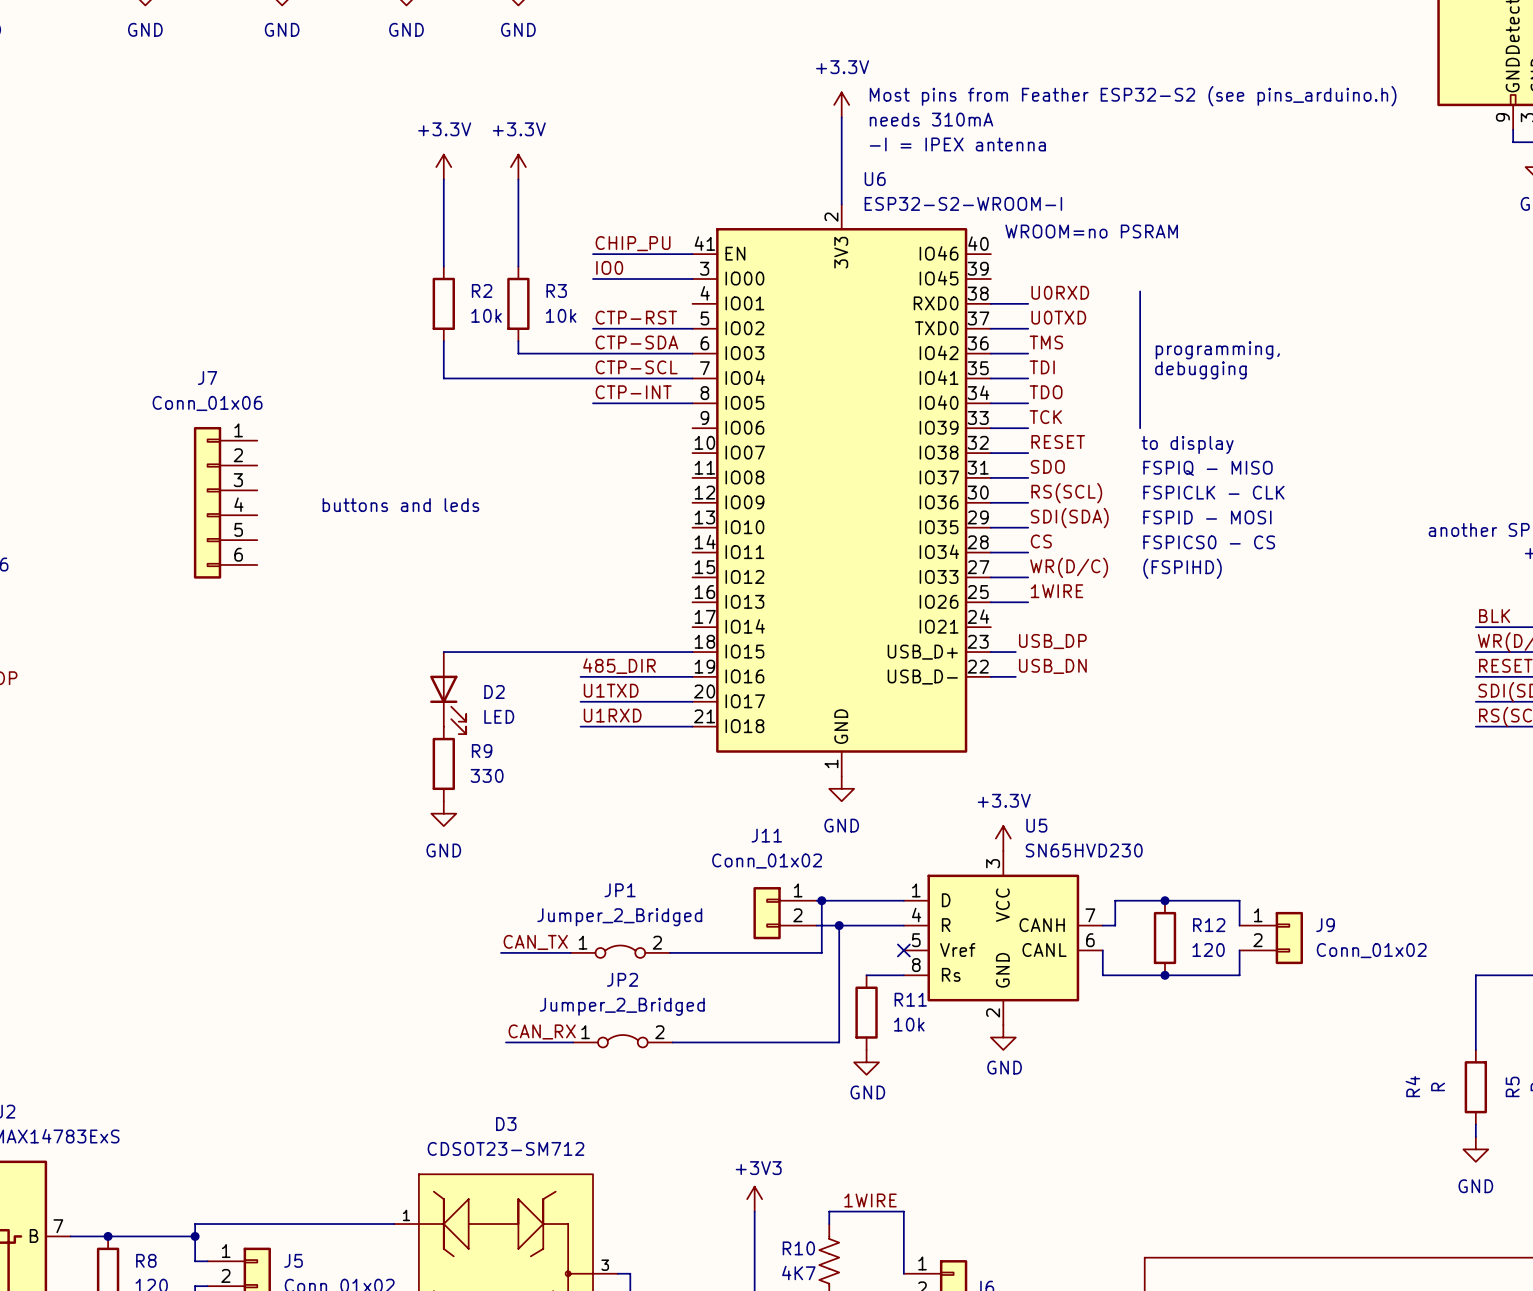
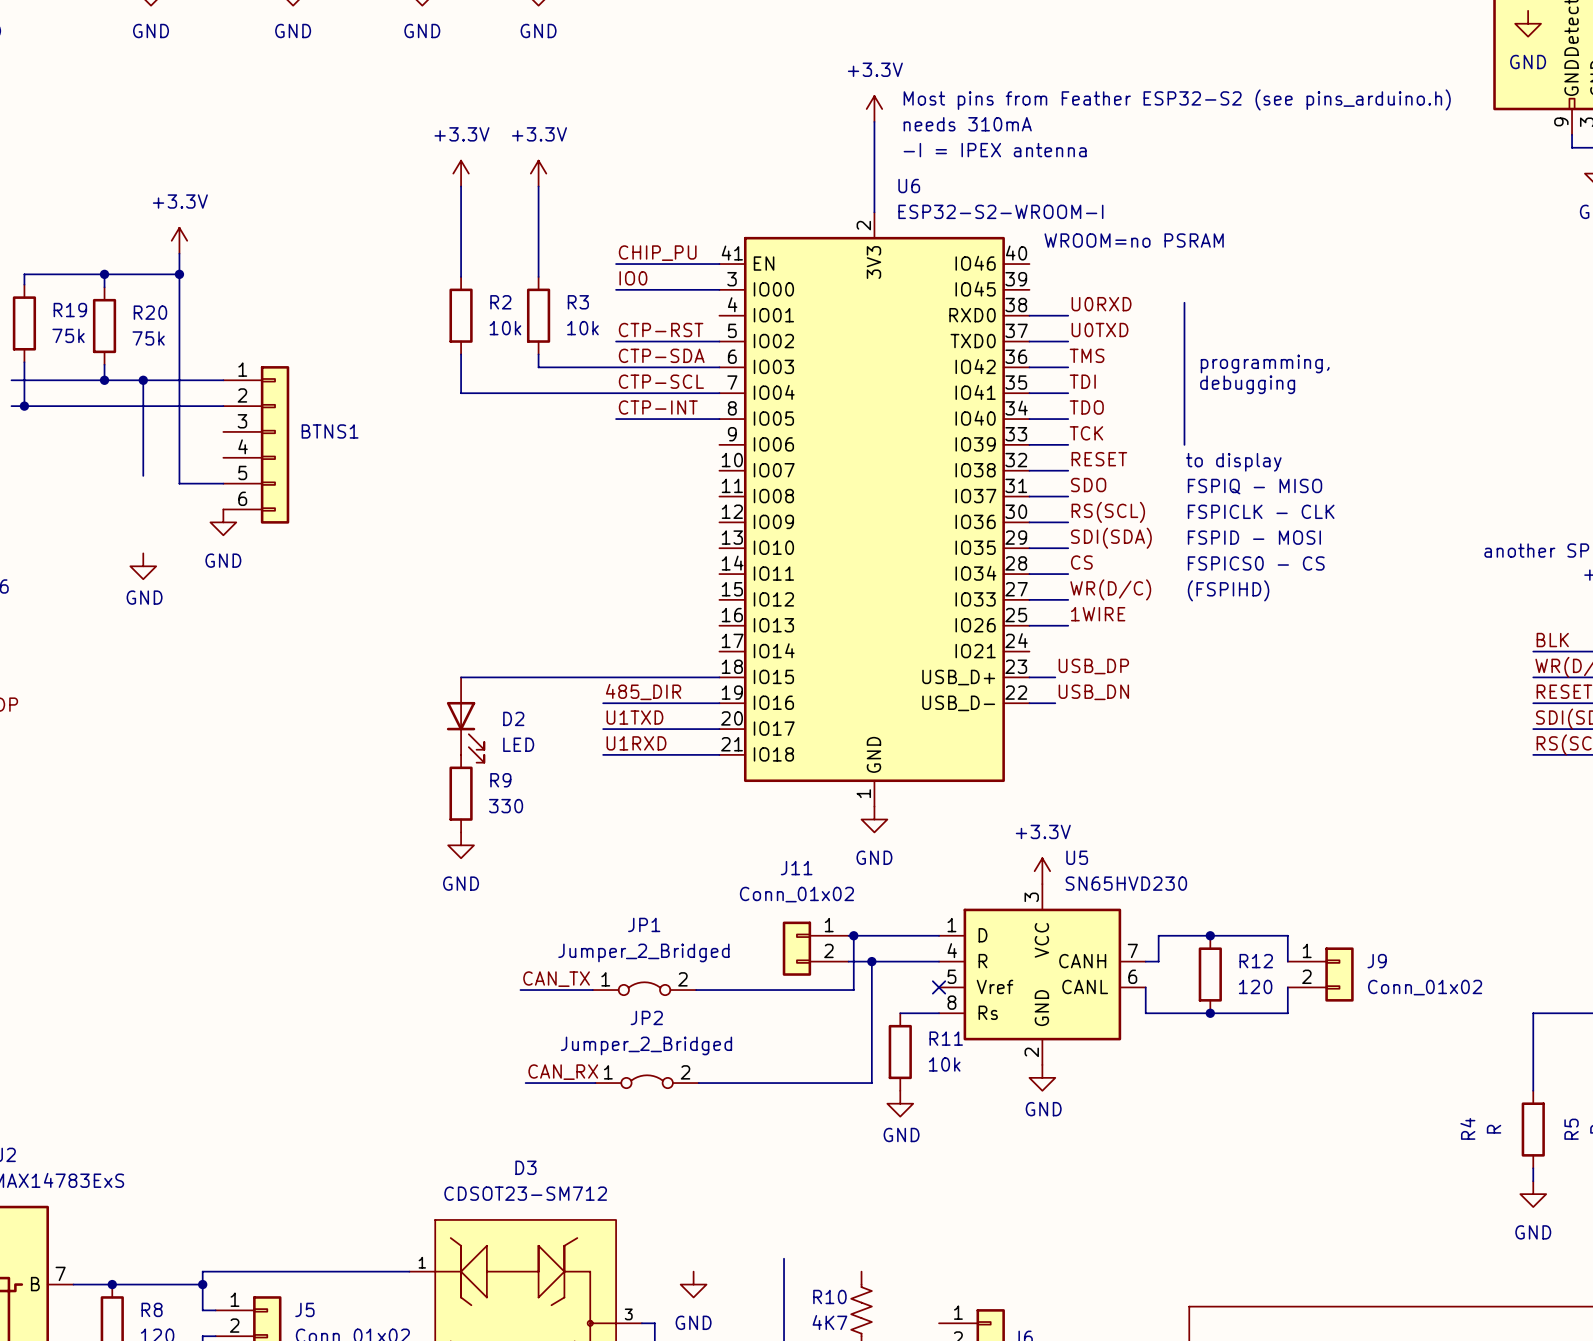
power symbol: none -> GND (1528, 23)
power symbol: none -> +3.3V (179, 240)
wire: none -> (179, 253) (179, 483) (223, 483)
wire: none -> (104, 274) (104, 287)
junction: none -> (104, 274)
wire: none -> (179, 274) (24, 274) (24, 284)
junction: none -> (179, 274)
R19: none -> 75k (24, 323)
R20: none -> 75k (104, 326)
wire: none -> (24, 362) (24, 406)
wire: none -> (104, 364) (104, 380)
wire: none -> (11, 380) (223, 380)
junction: none -> (104, 380)
wire: none -> (143, 380) (143, 475)
junction: none -> (143, 380)
wire: none -> (11, 406) (223, 406)
junction: none -> (24, 406)
BTNS1: none -> (256, 444)
power symbol: none -> GND (223, 522)
J7: Conn_01x06 (225, 502) -> none
text: buttons and leds (400, 505) -> none
power symbol: none -> GND (143, 566)
power symbol: +3V3 (754, 1199) -> none
label: 1WIRE (870, 1200) -> none
wire: (829, 1224) (829, 1211) (903, 1211) (903, 1273) -> none
power symbol: none -> GND (693, 1284)

